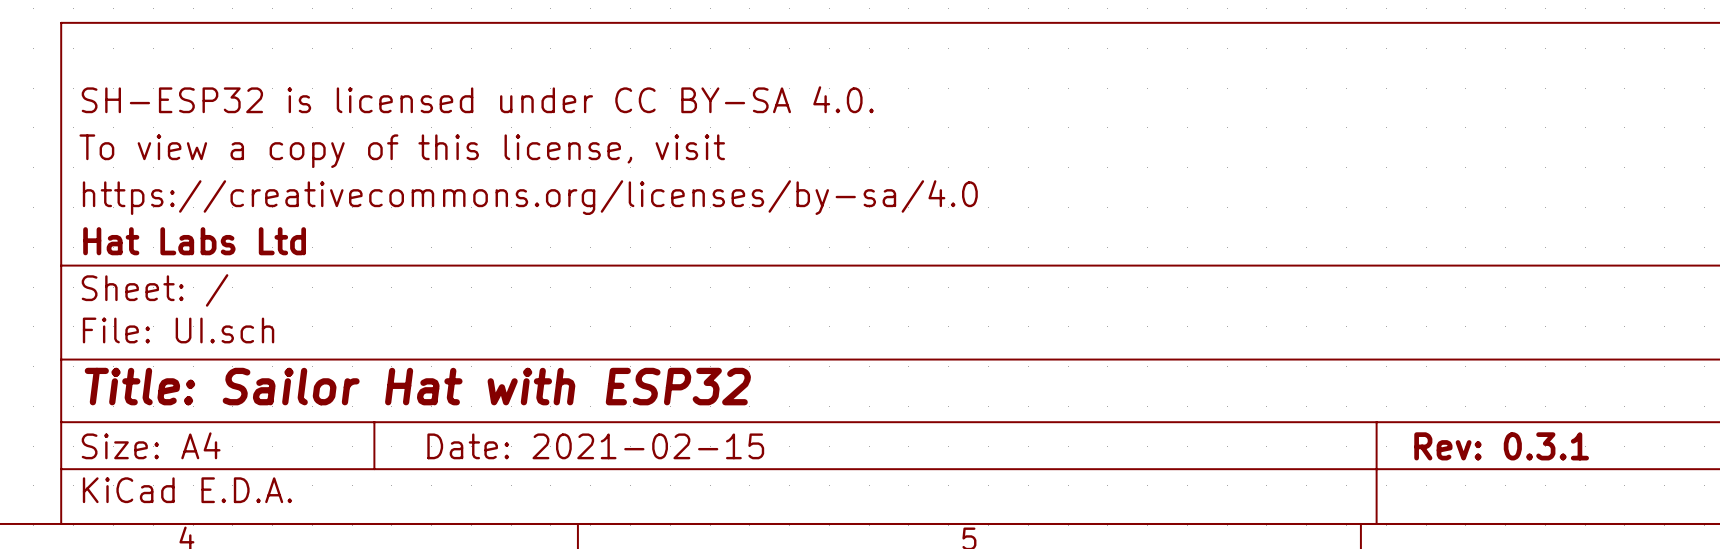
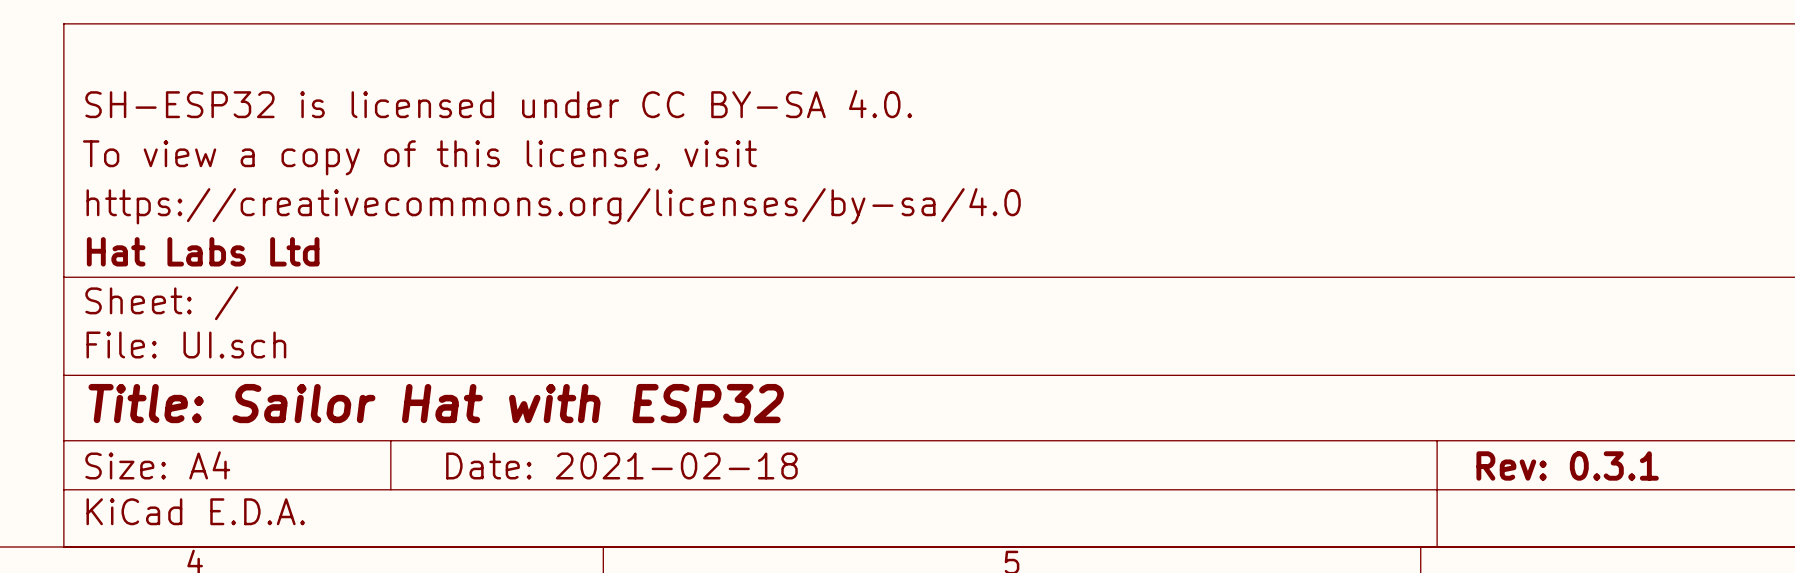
title block: Date: 2021-02-15 (595, 446) -> Date: 2021-02-18 (621, 465)

